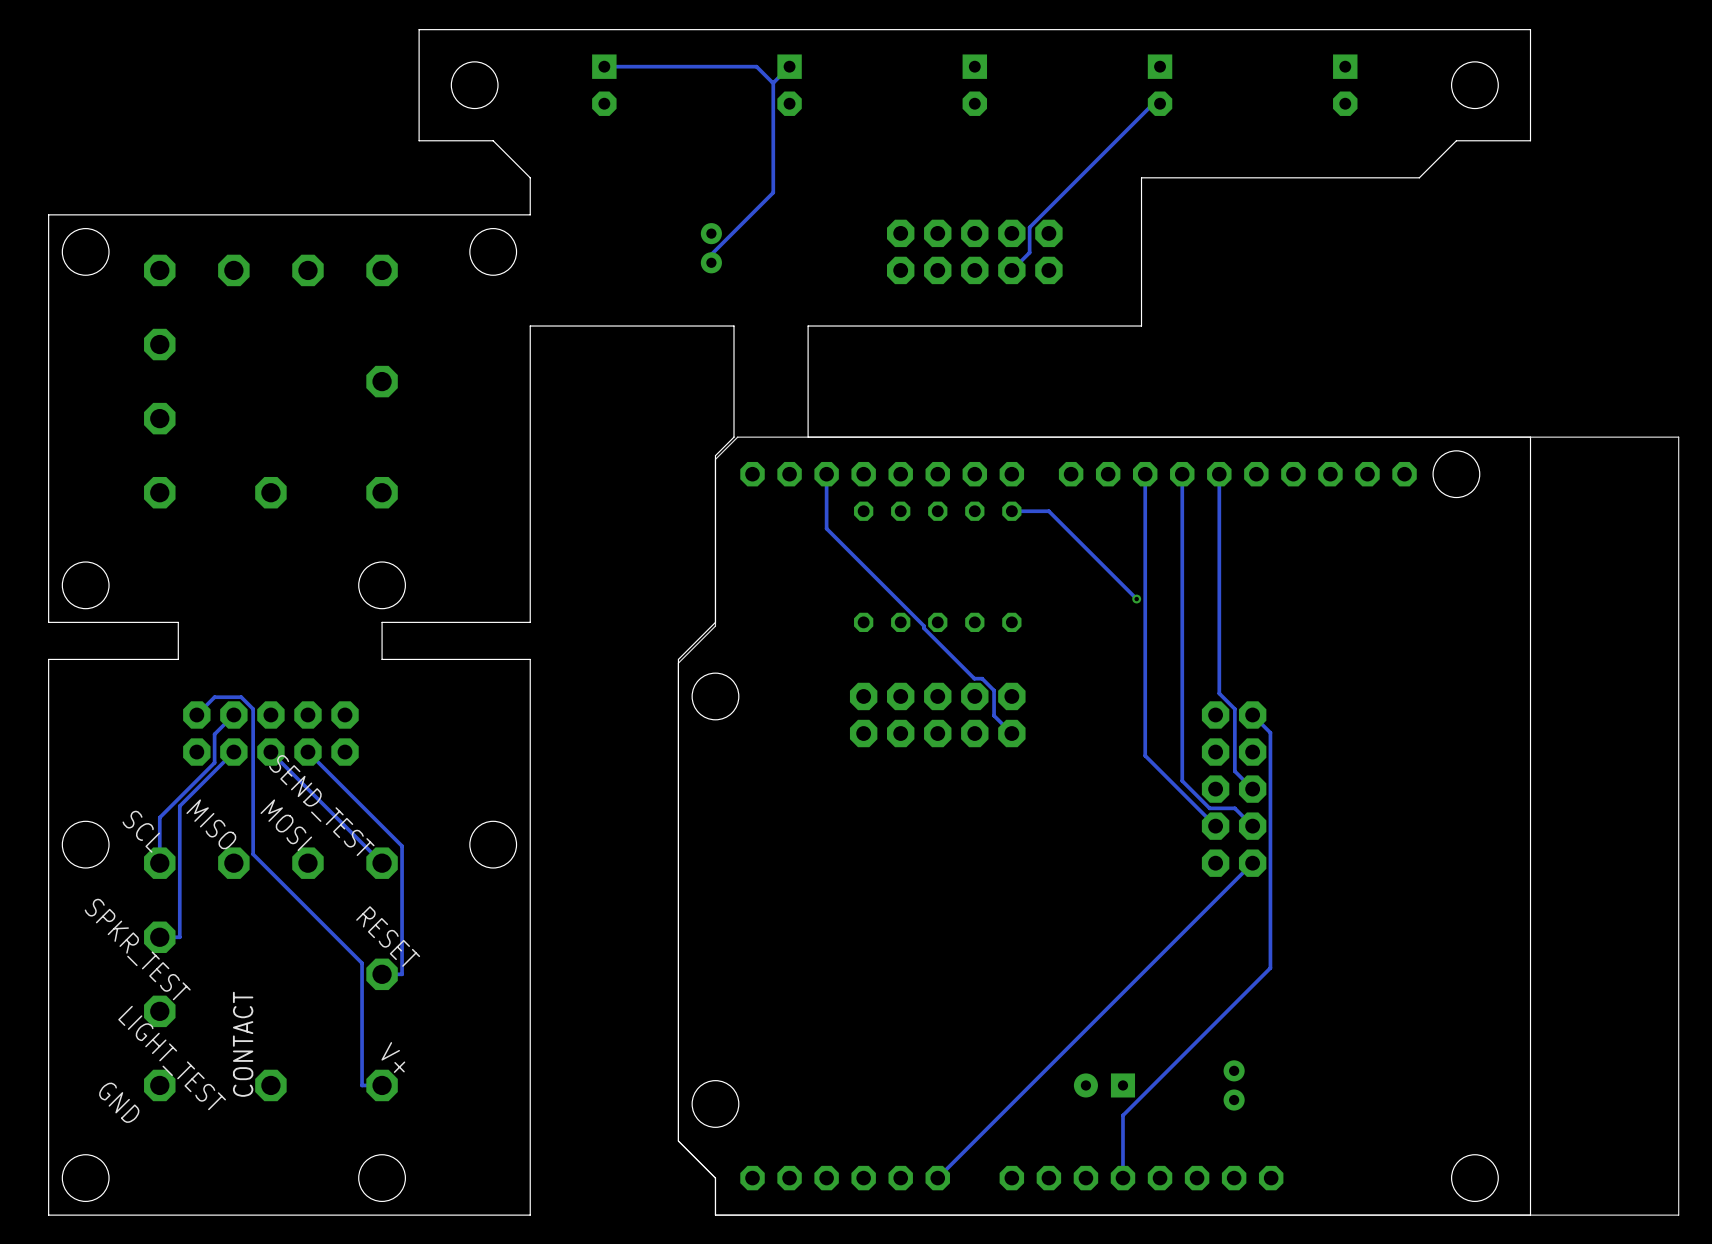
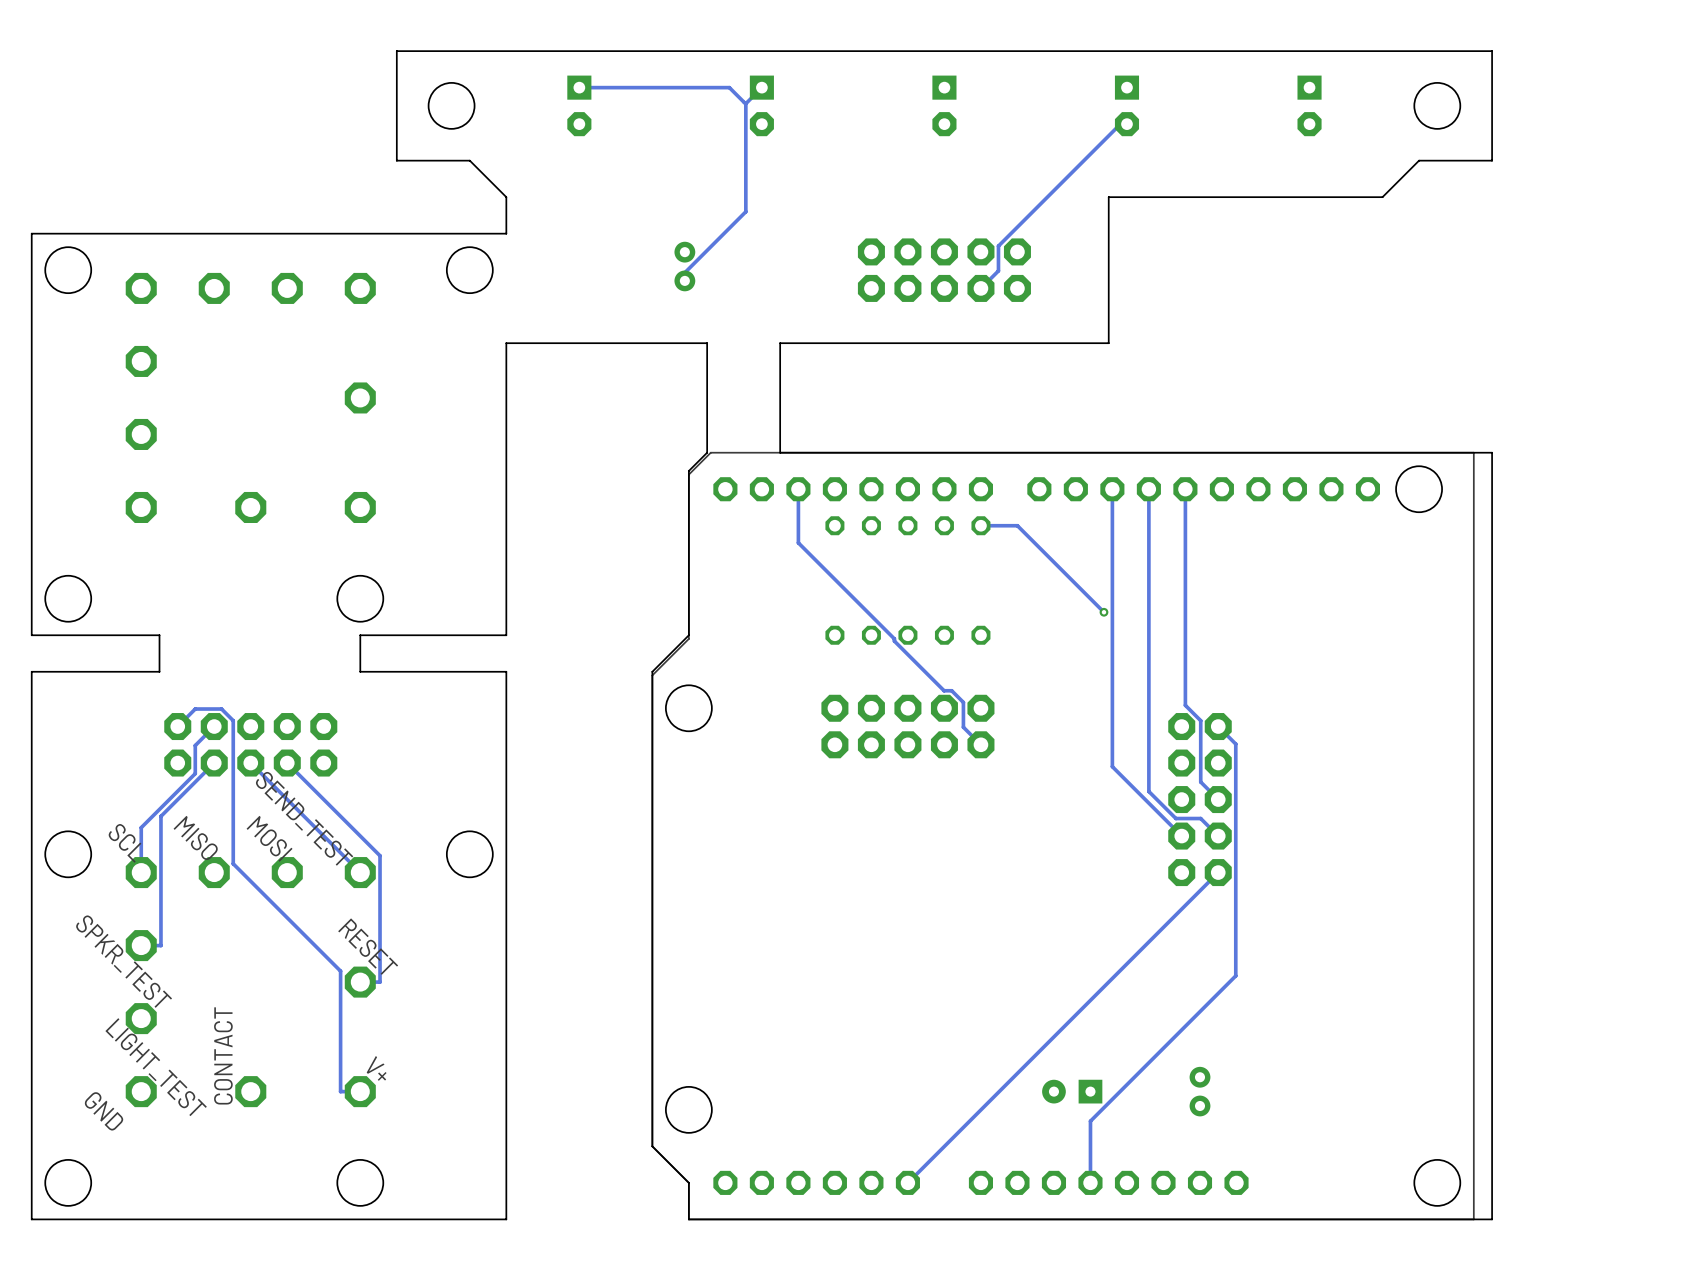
part: none -> (1063, 836)
part: (1178, 826) -> none

